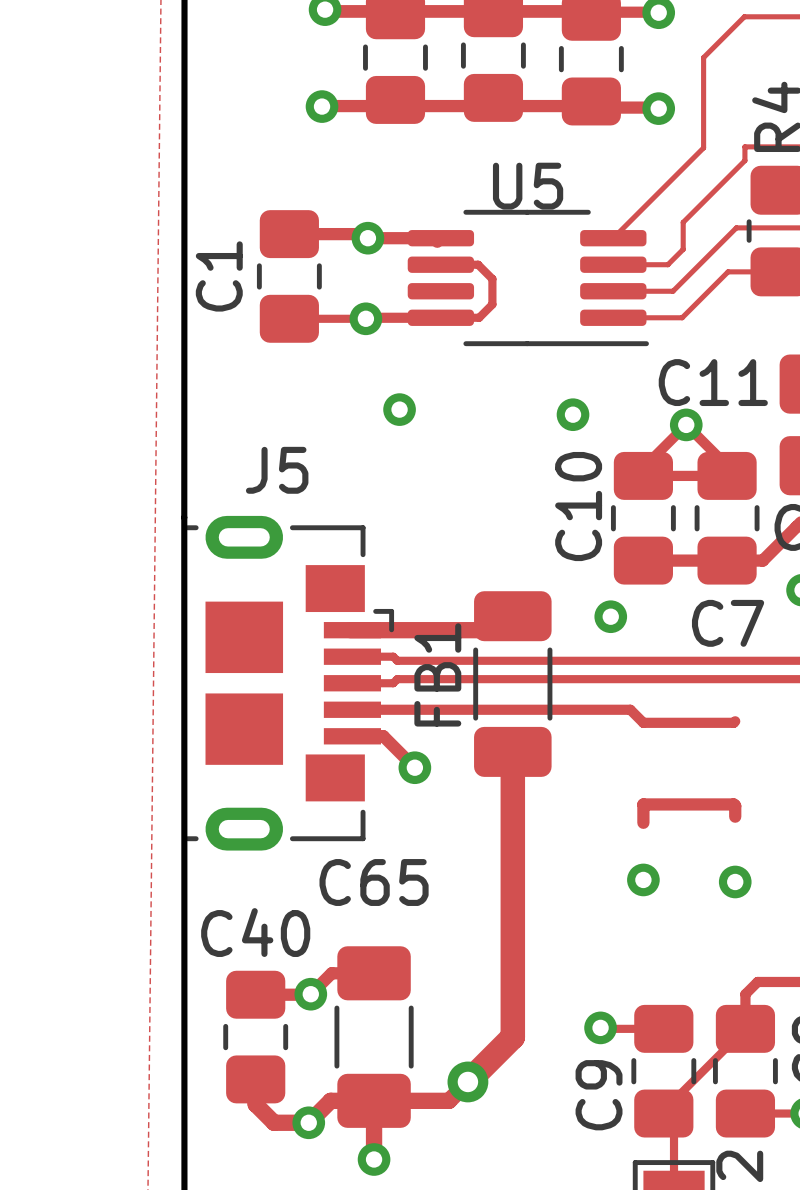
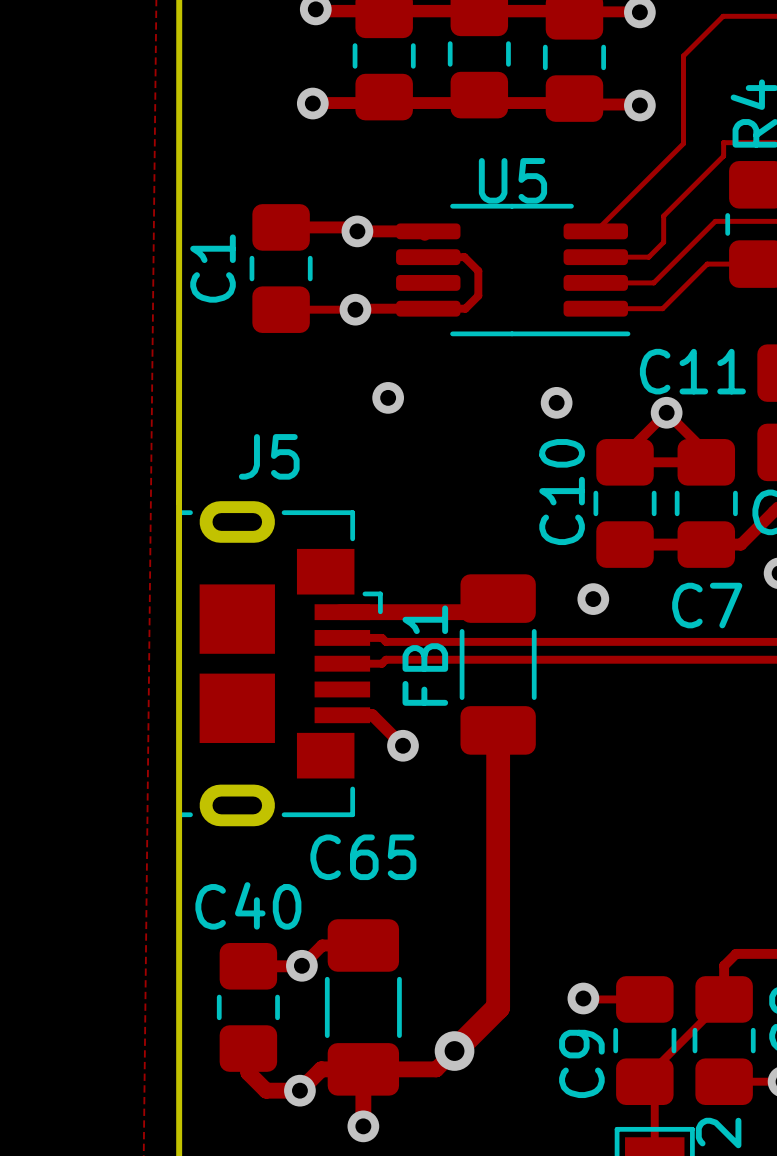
track: (350, 709) (630, 709) (643, 722) (733, 722) (735, 721) -> none
track: (735, 816) (733, 804) (643, 804) (643, 822) -> none
via: (643, 879) -> none
via: (735, 881) -> none

